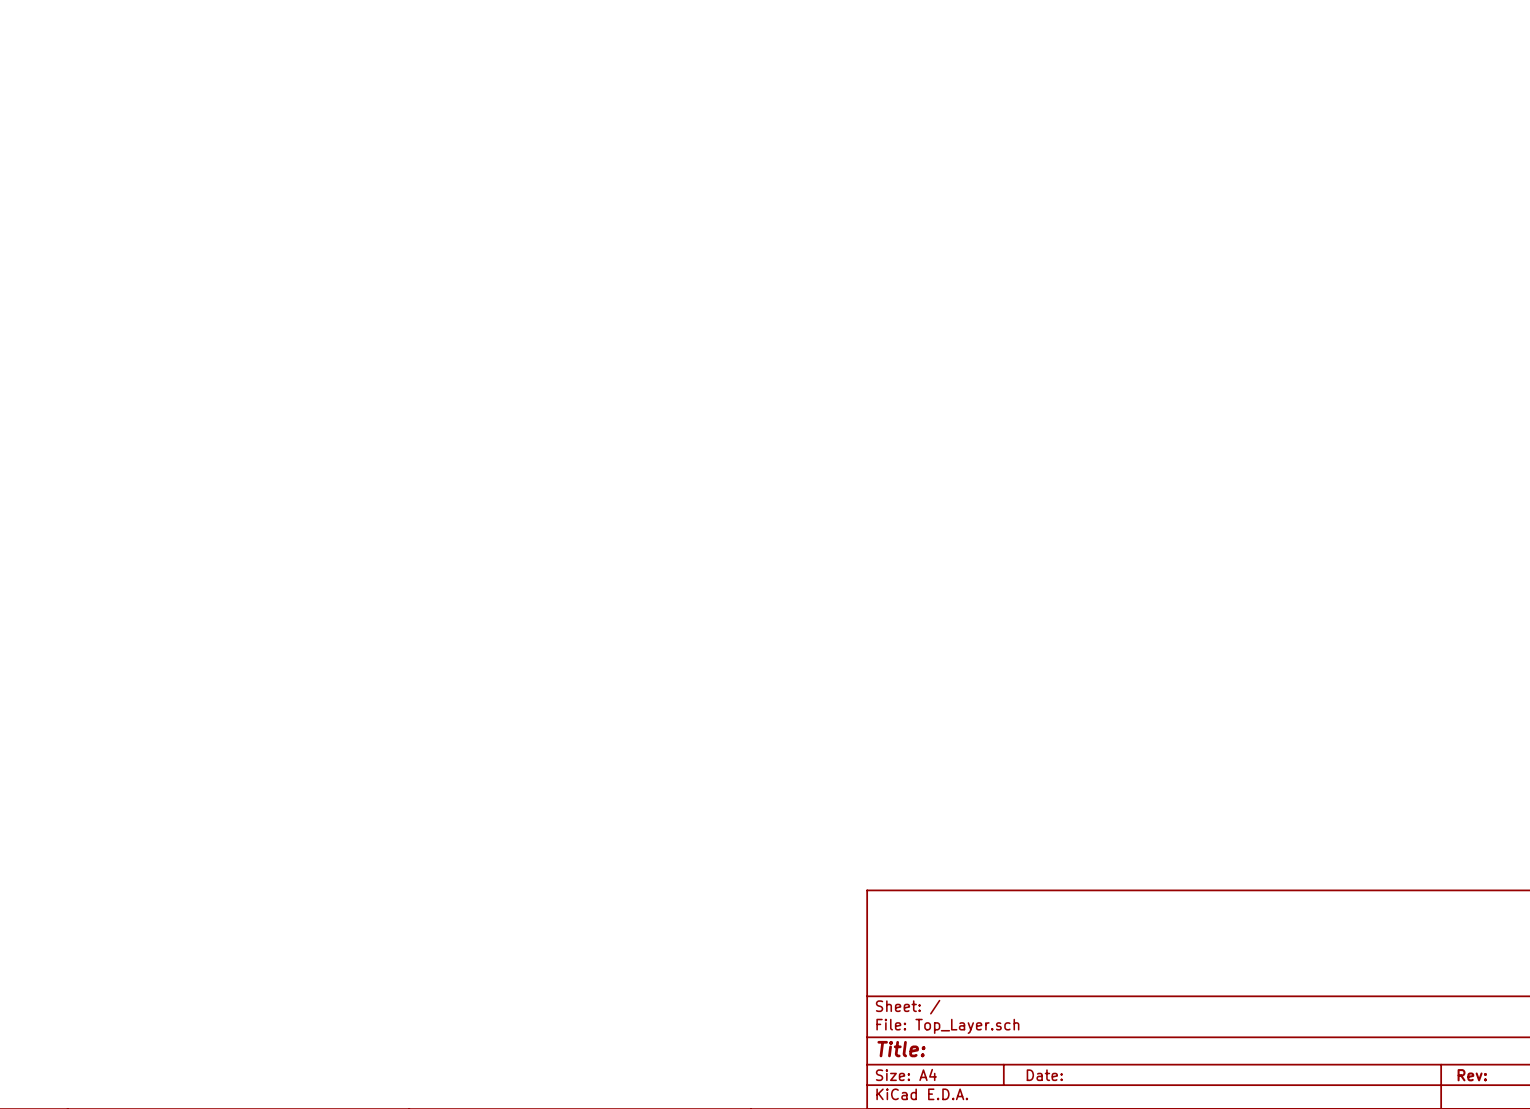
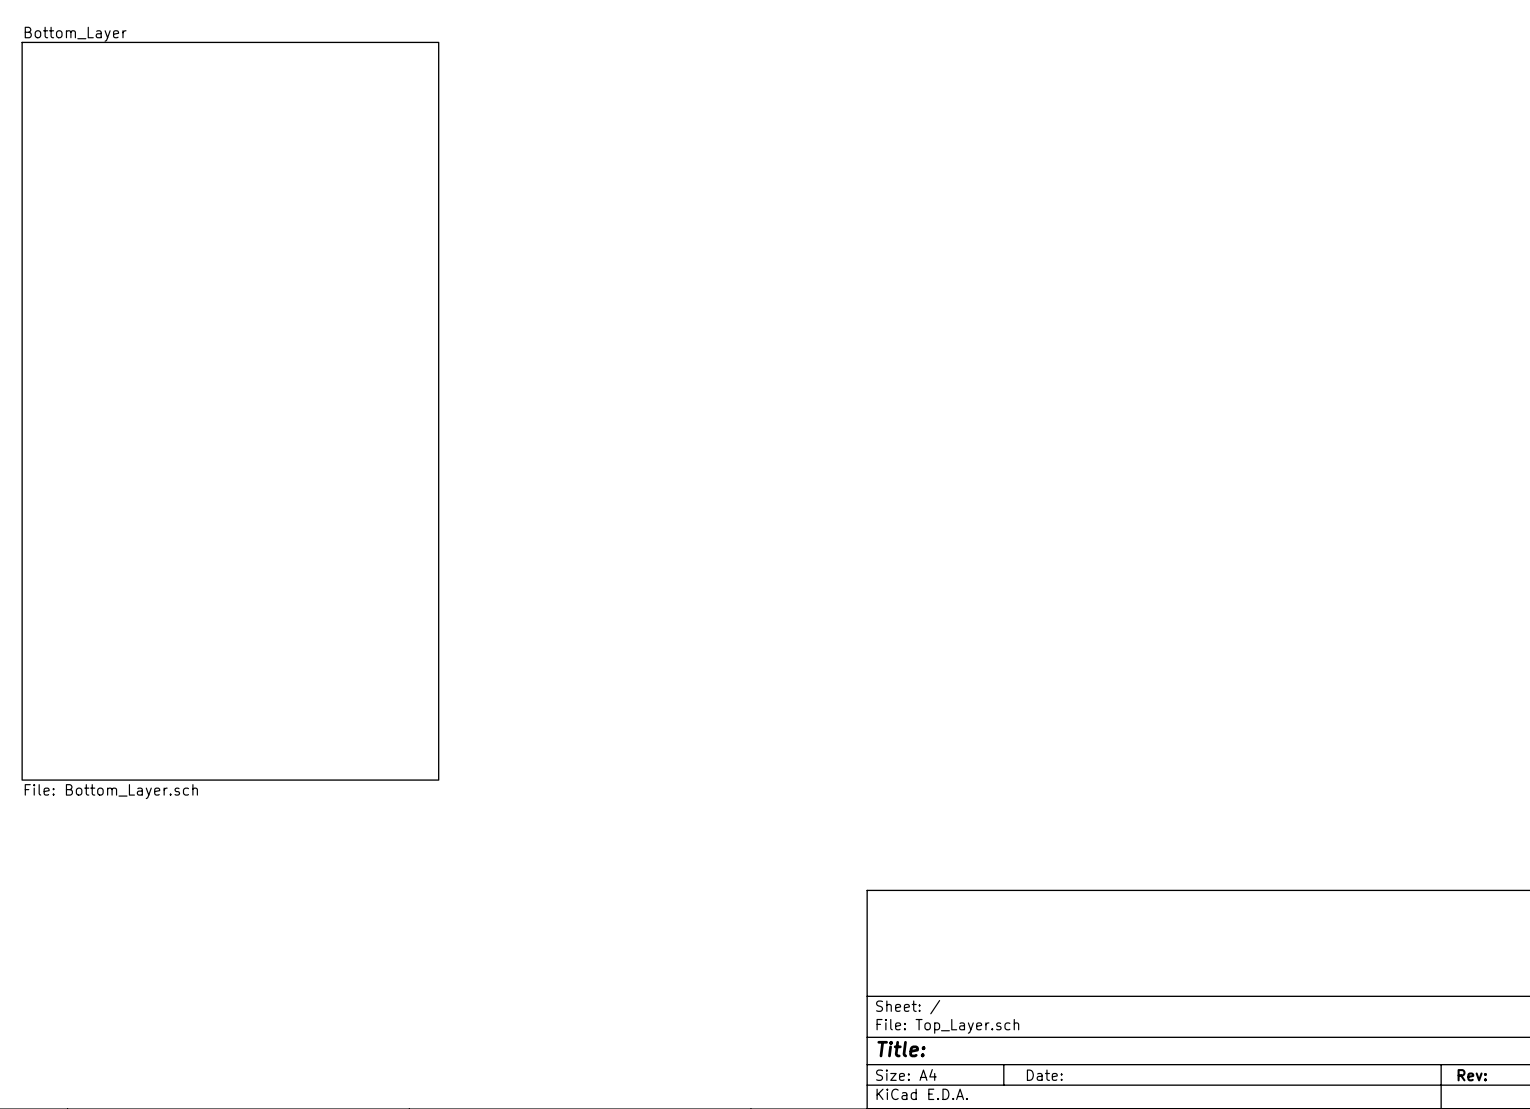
sheet Bottom_Layer: none -> File: Bottom_Layer.sch (230, 411)

